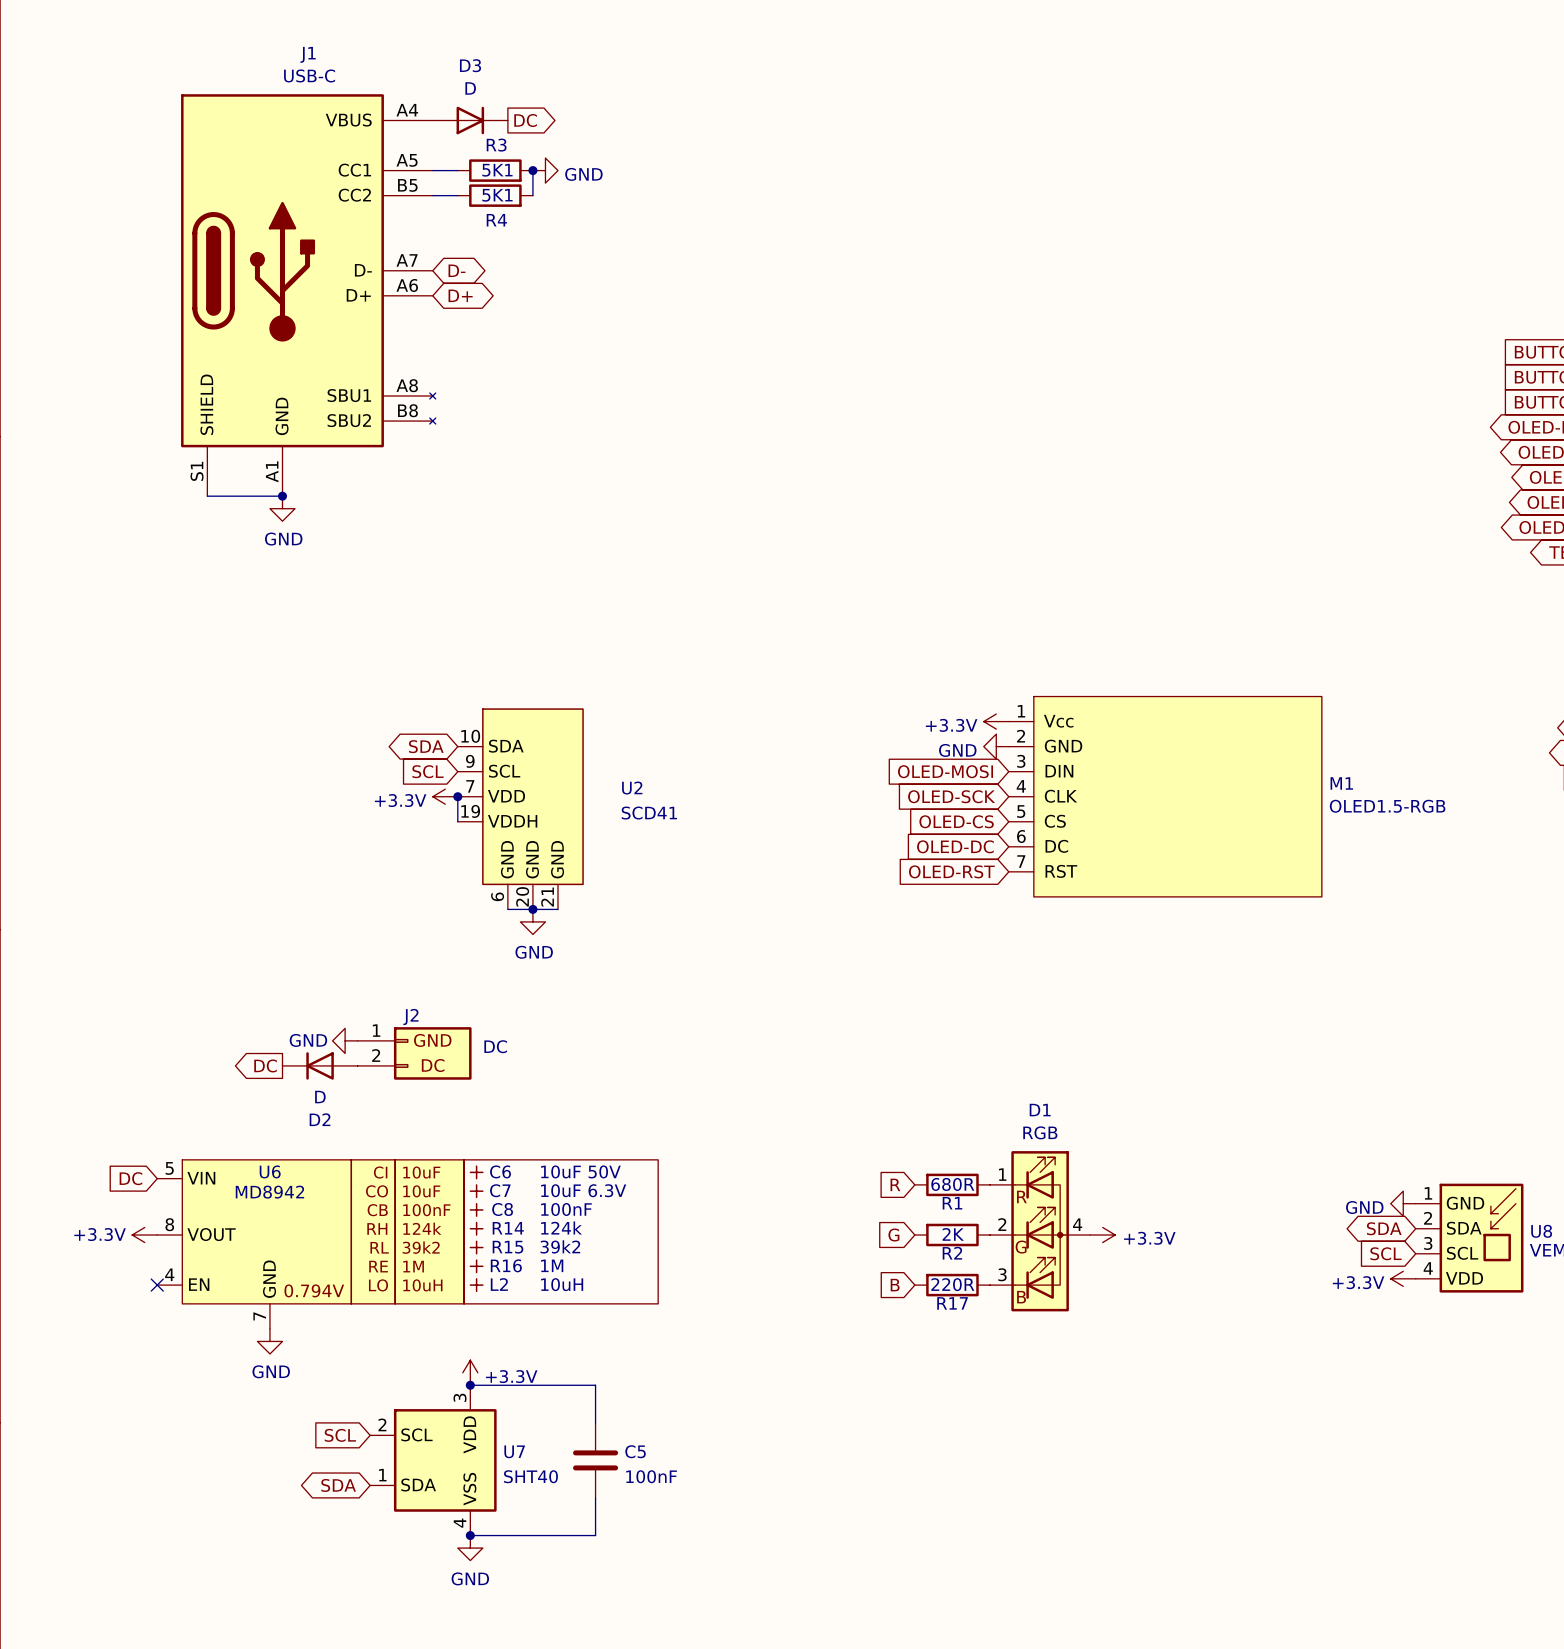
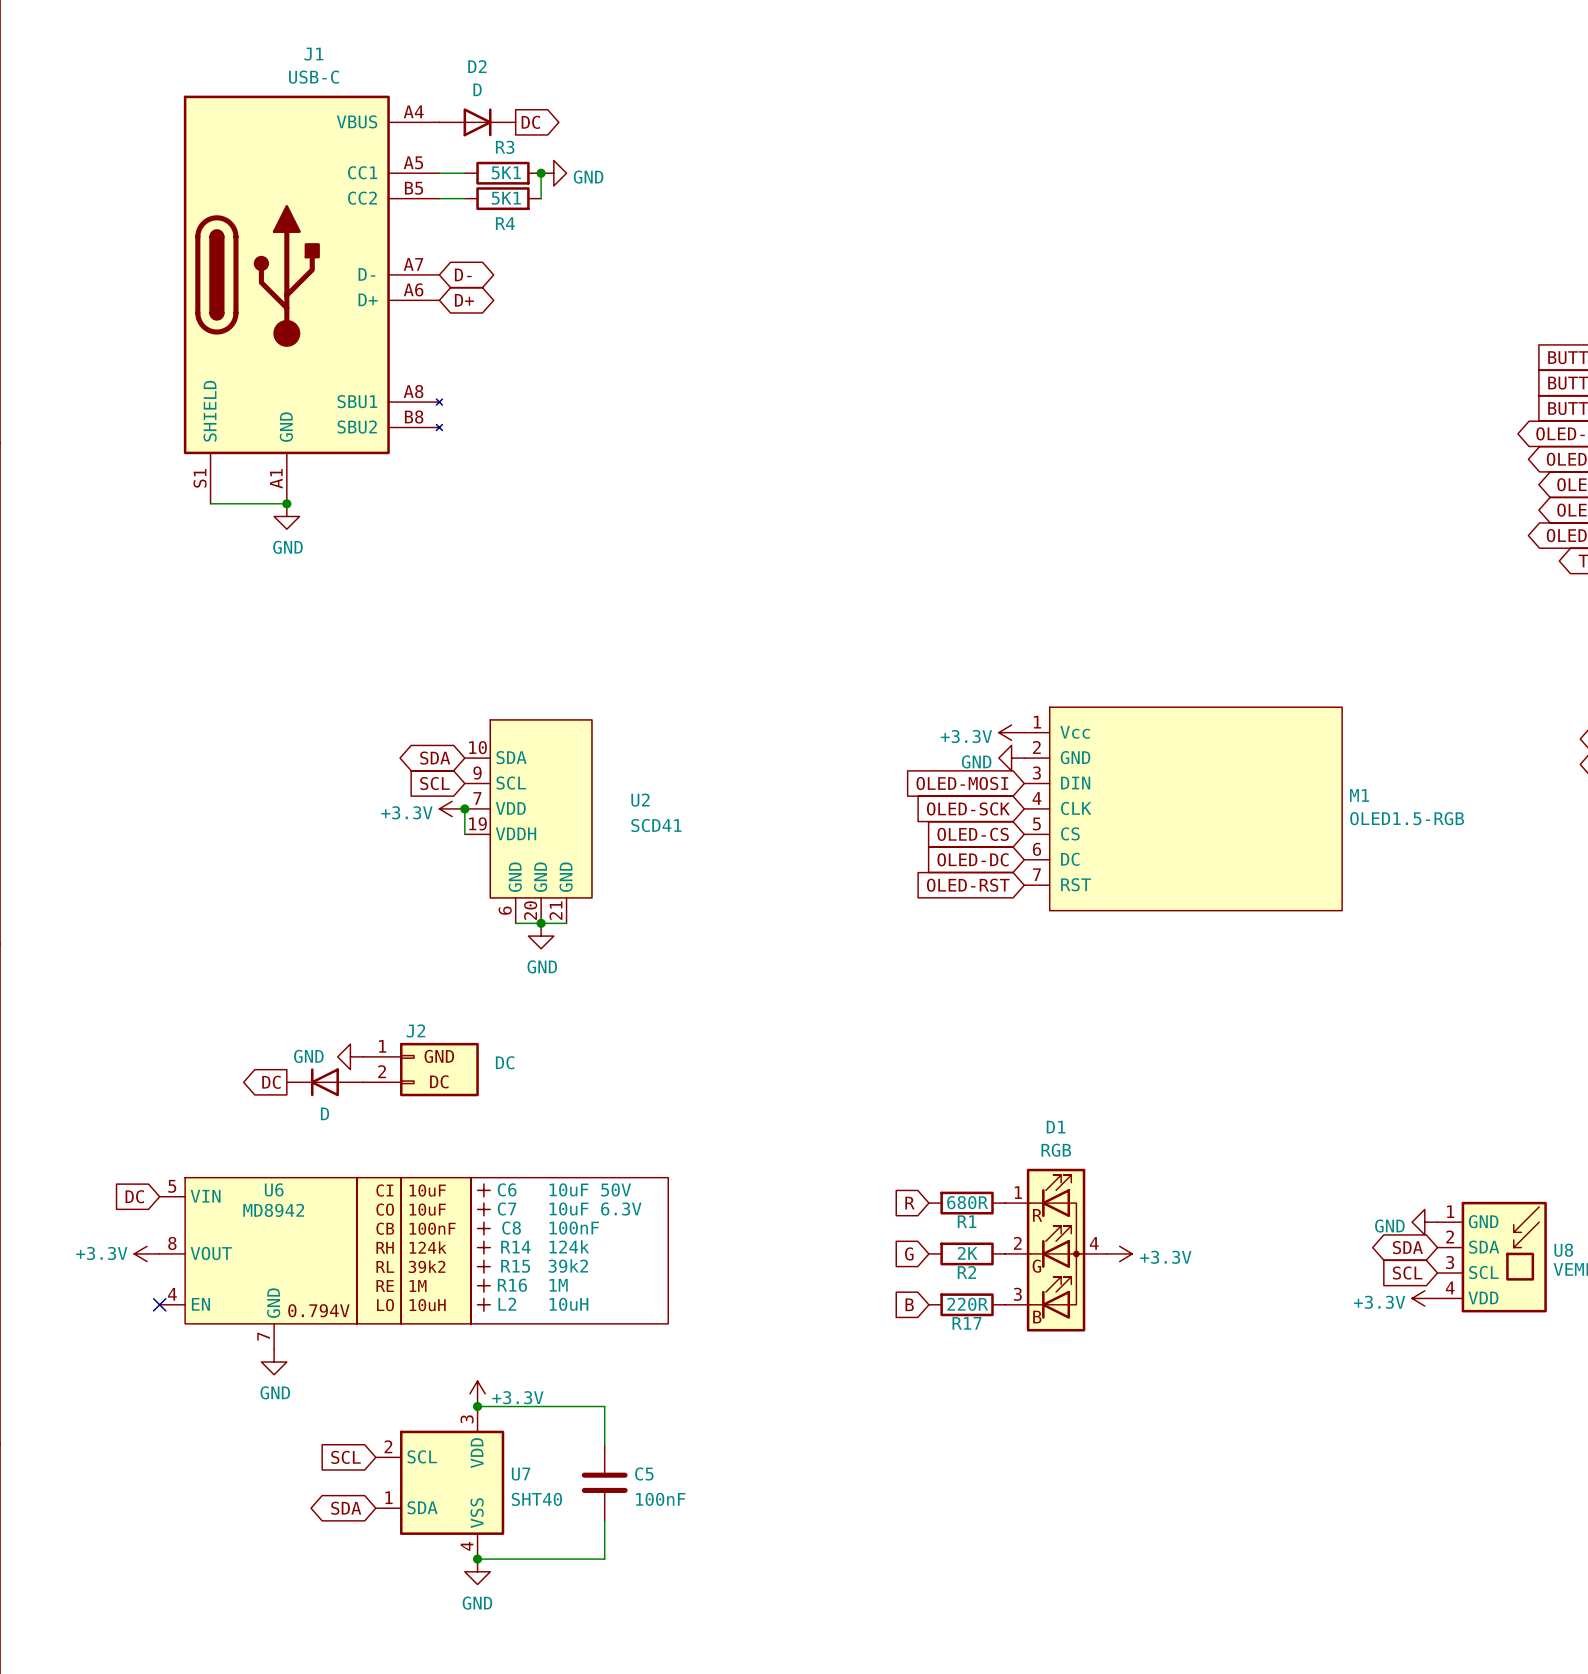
D3 name: D3 (470, 65) -> D2 (477, 66)
D2 name: D2 (320, 1119) -> none

